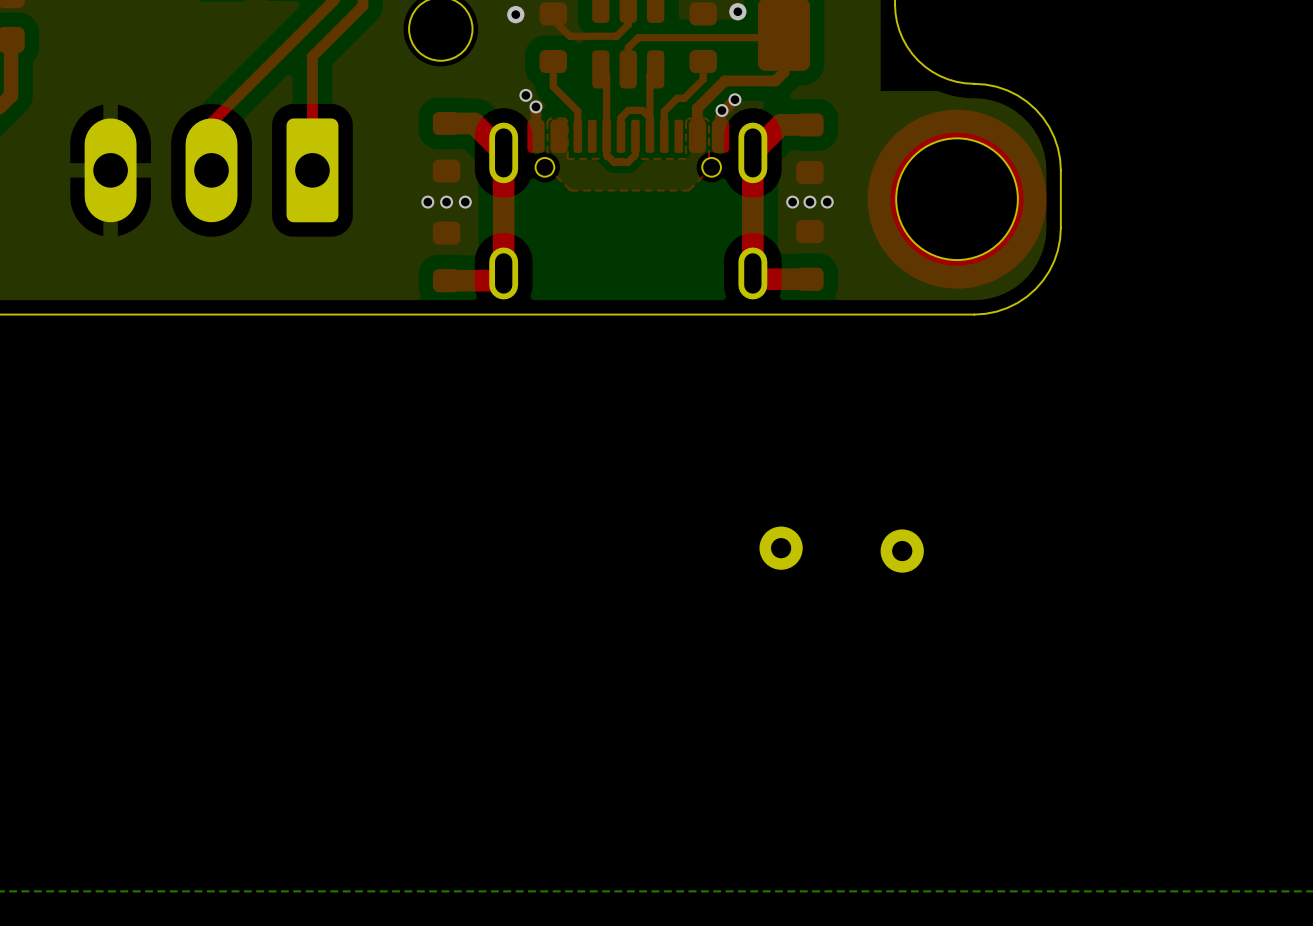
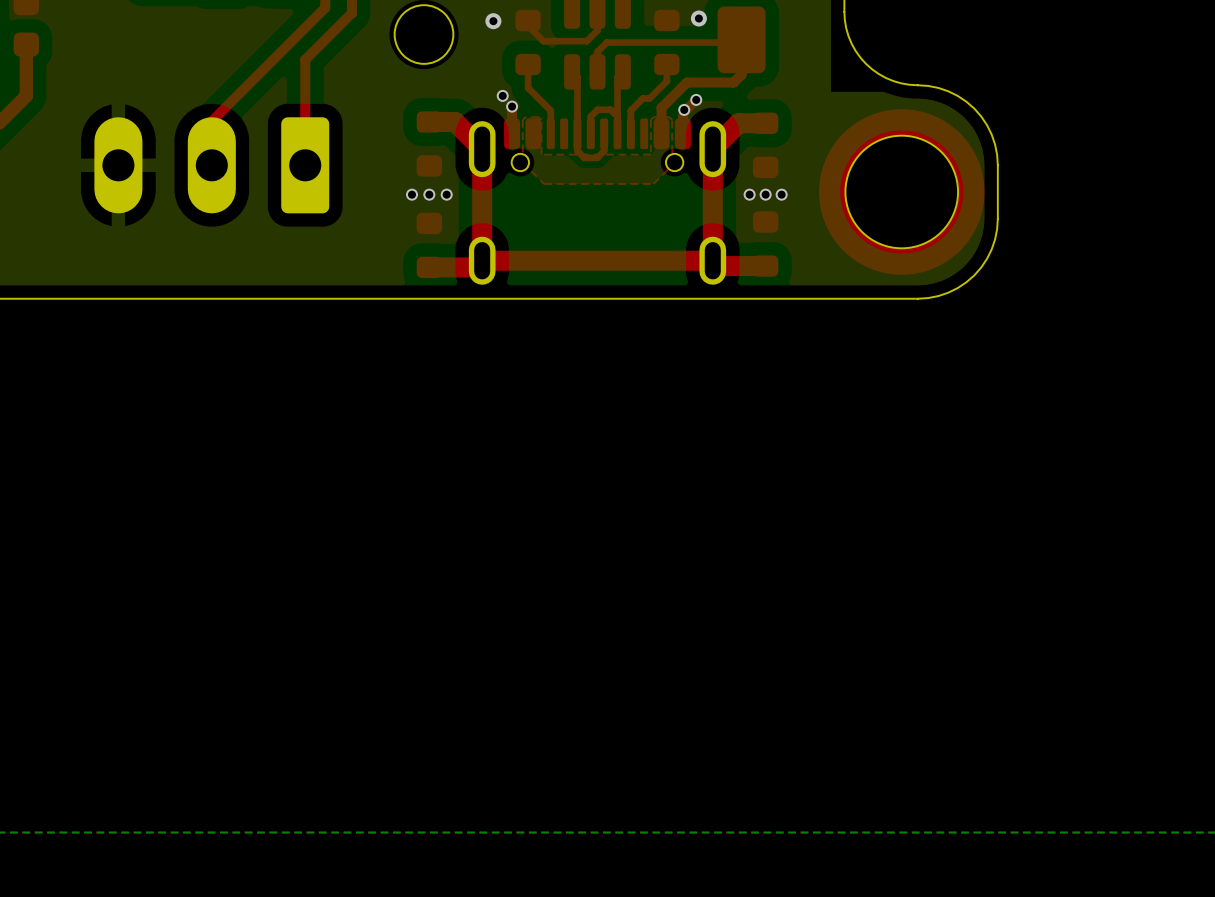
top track: none -> (712, 260) (482, 260)
part: (781, 548) -> none
part: (902, 551) -> none

